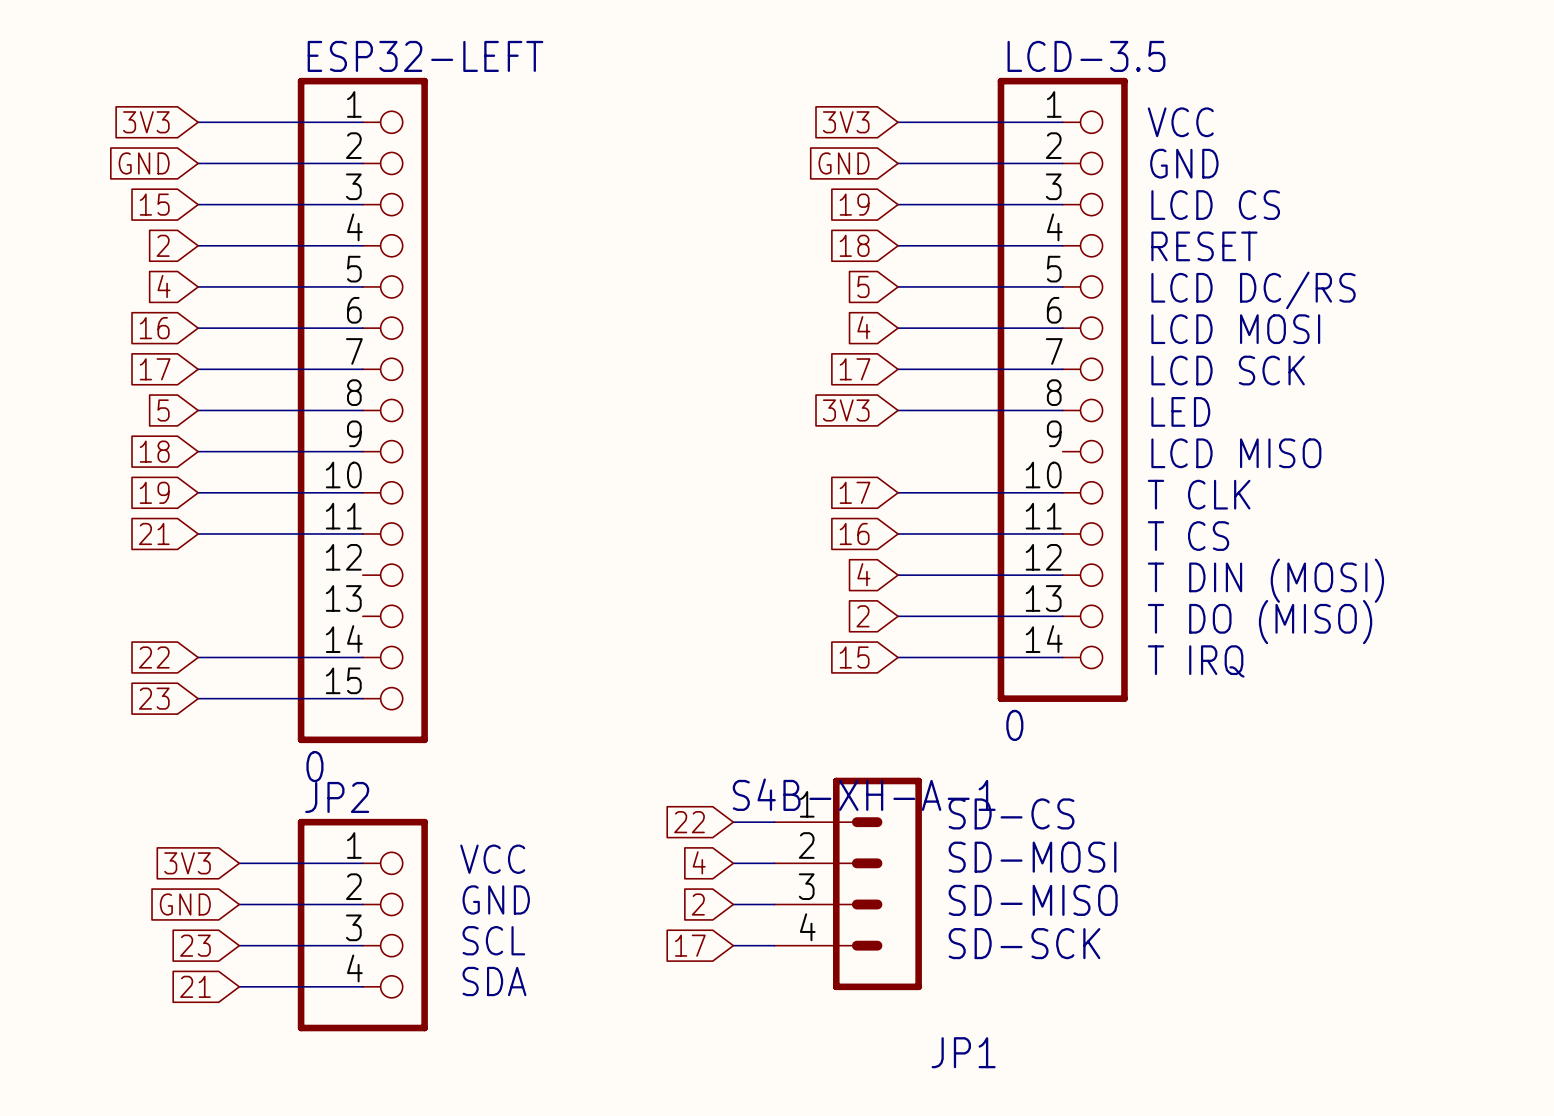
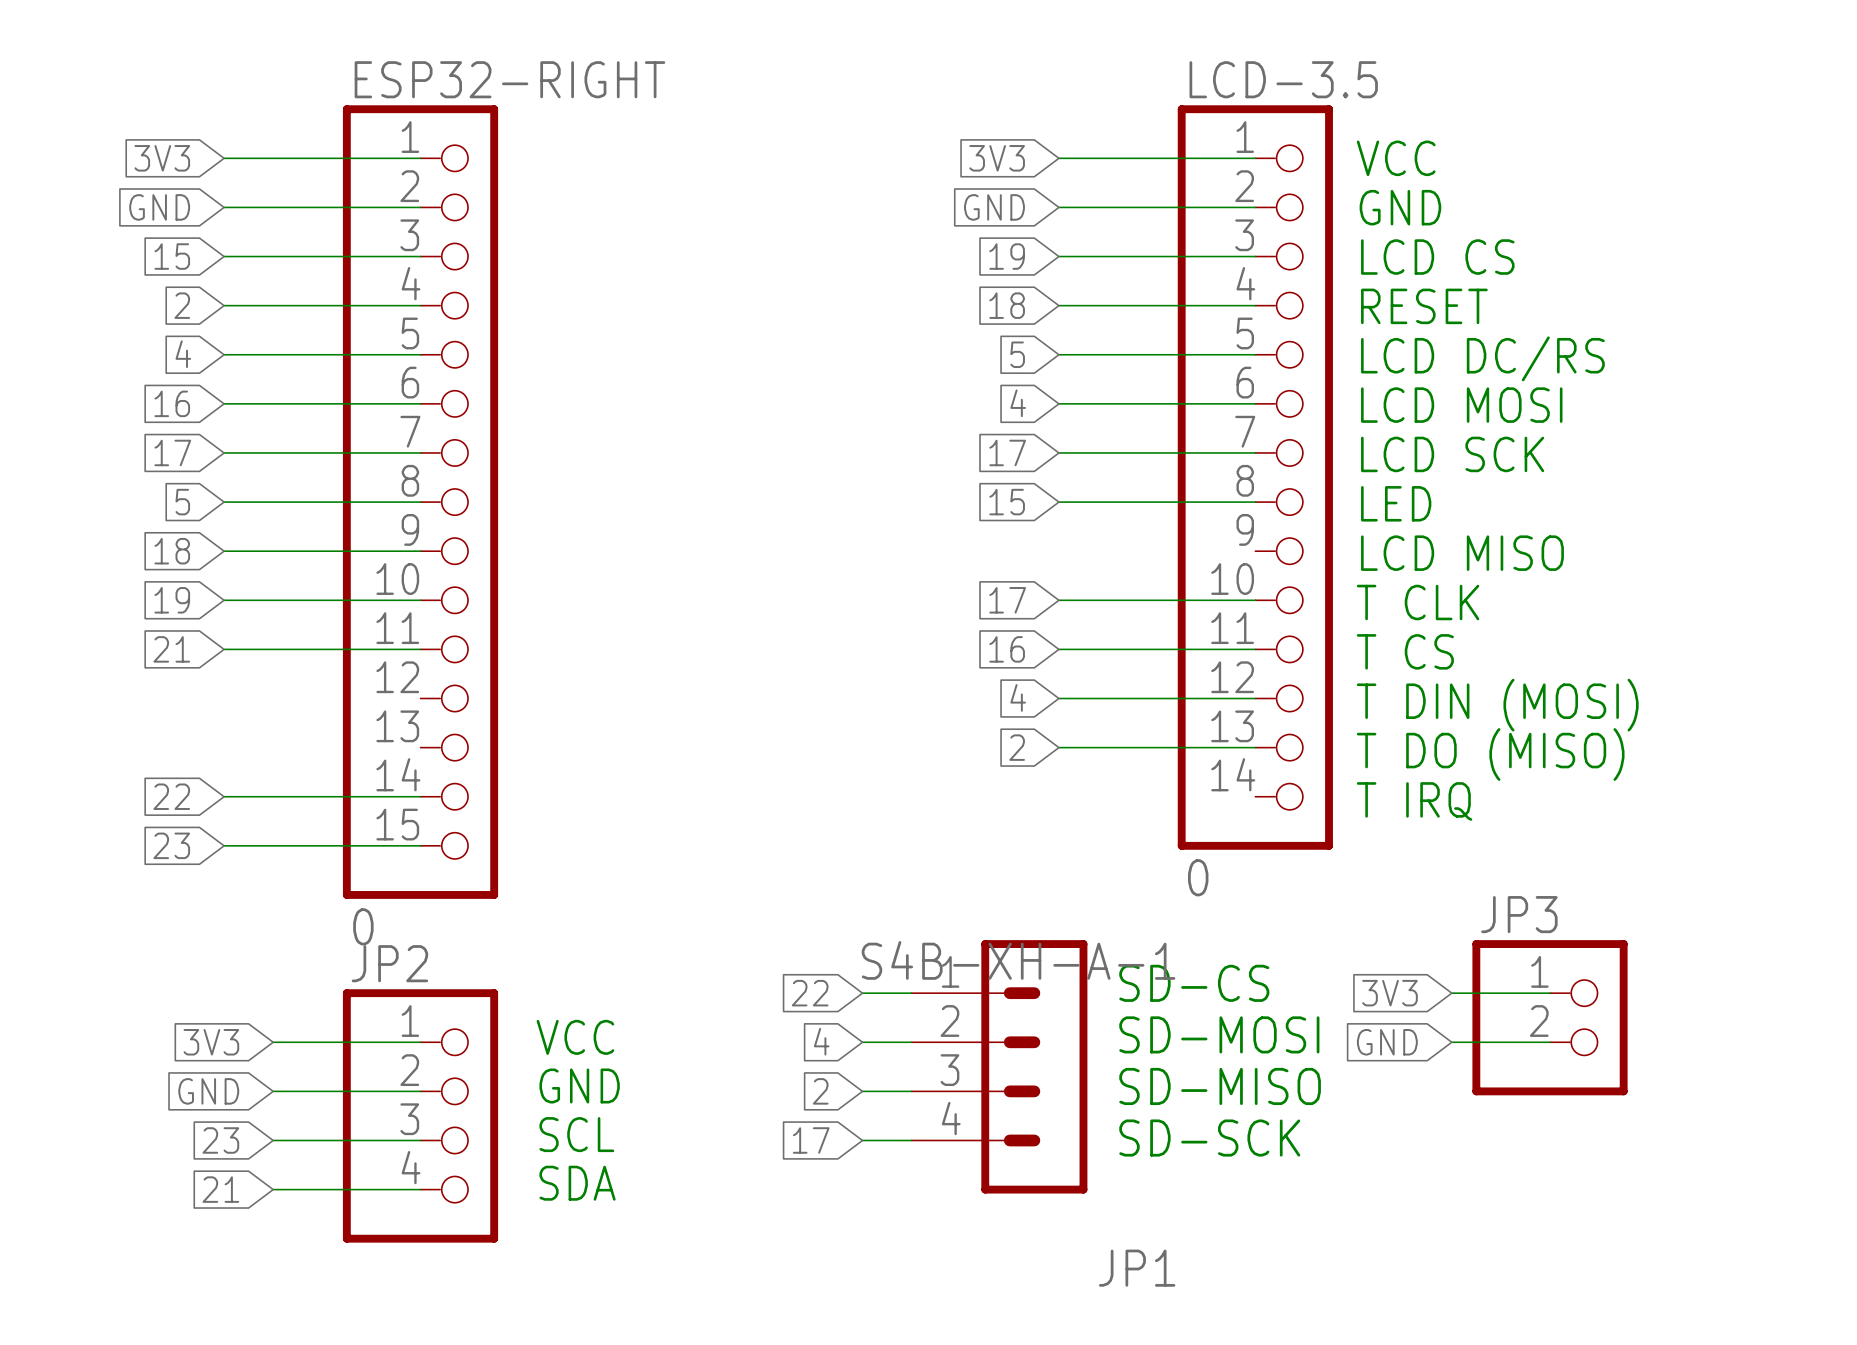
ESP32-LEFT name: ESP32-LEFT (425, 56) -> ESP32-RIGHT (509, 79)
global label: 3V3 (846, 410) -> 15 (1007, 502)
global label: 15 (854, 657) -> none
wire: (898, 657) (1062, 657) -> none
global label: none -> 3V3 (1389, 993)
wire: none -> (1451, 993) (1550, 993)
JP3: none -> (1550, 1017)
global label: none -> GND (1387, 1042)
wire: none -> (1451, 1042) (1550, 1042)

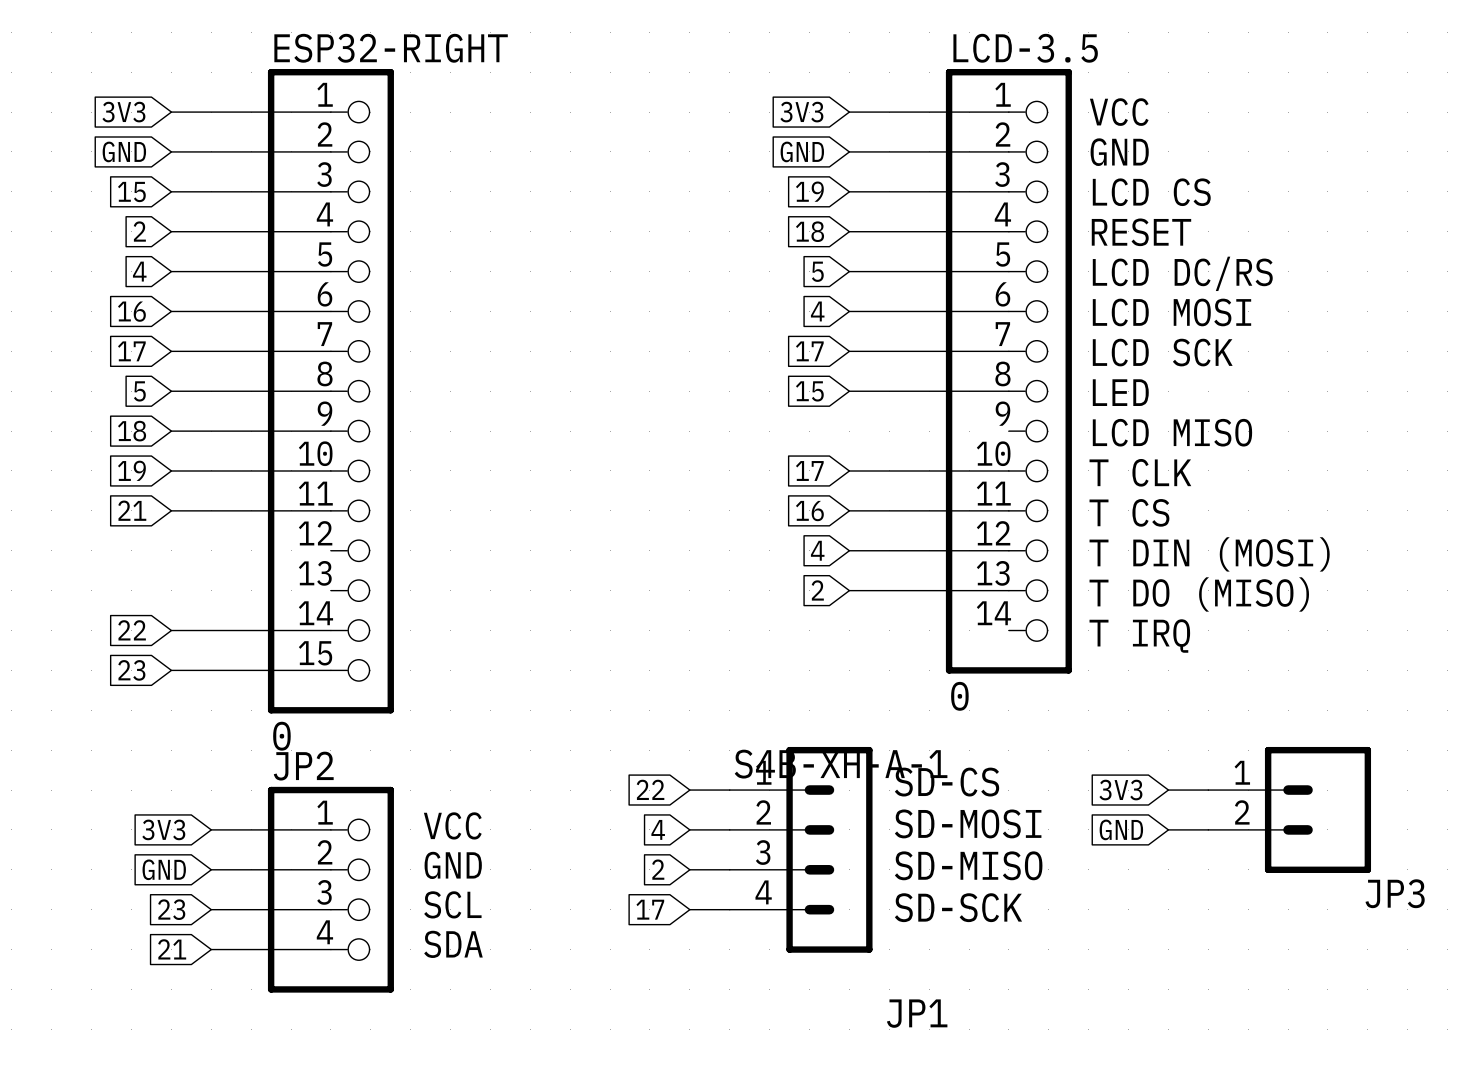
JP3 name position: JP3 (1519, 914) -> JP3 (1395, 893)
JP3 symbol: [1472, 940, 1628, 1096] -> [1208, 746, 1372, 873]

